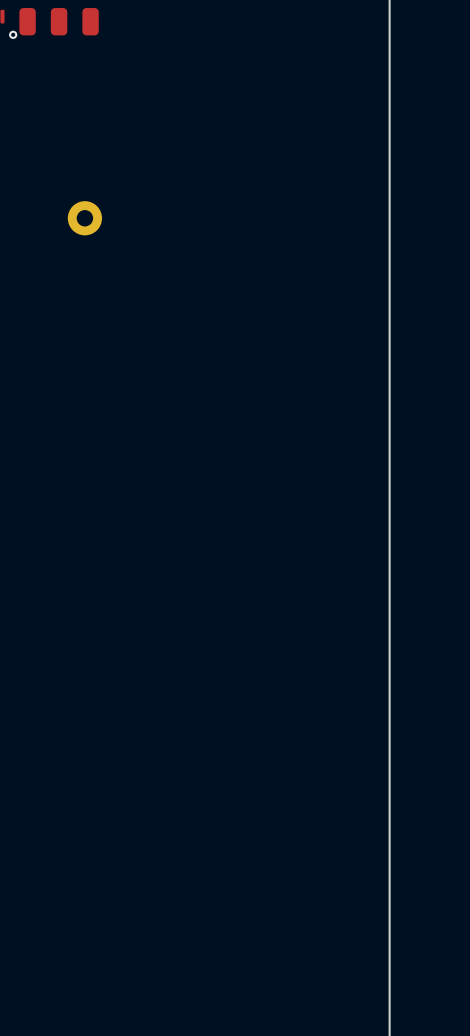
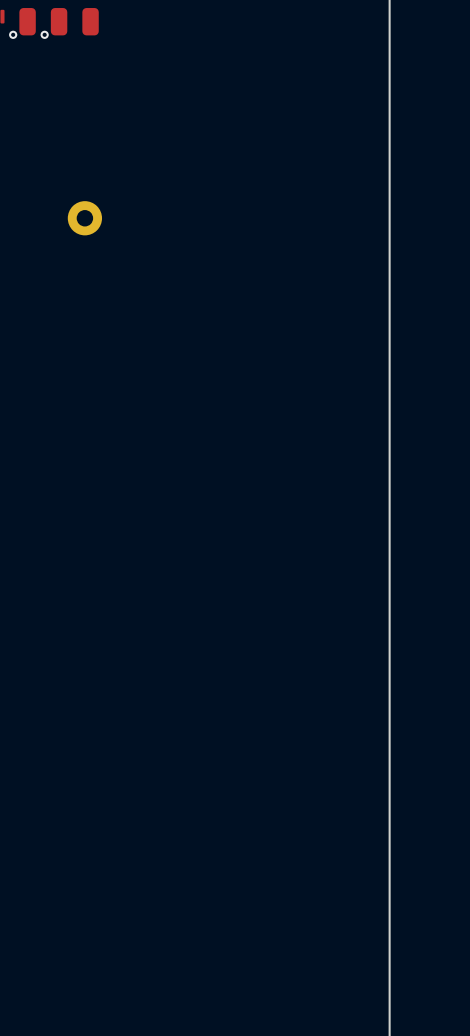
via: none -> (44, 34)

